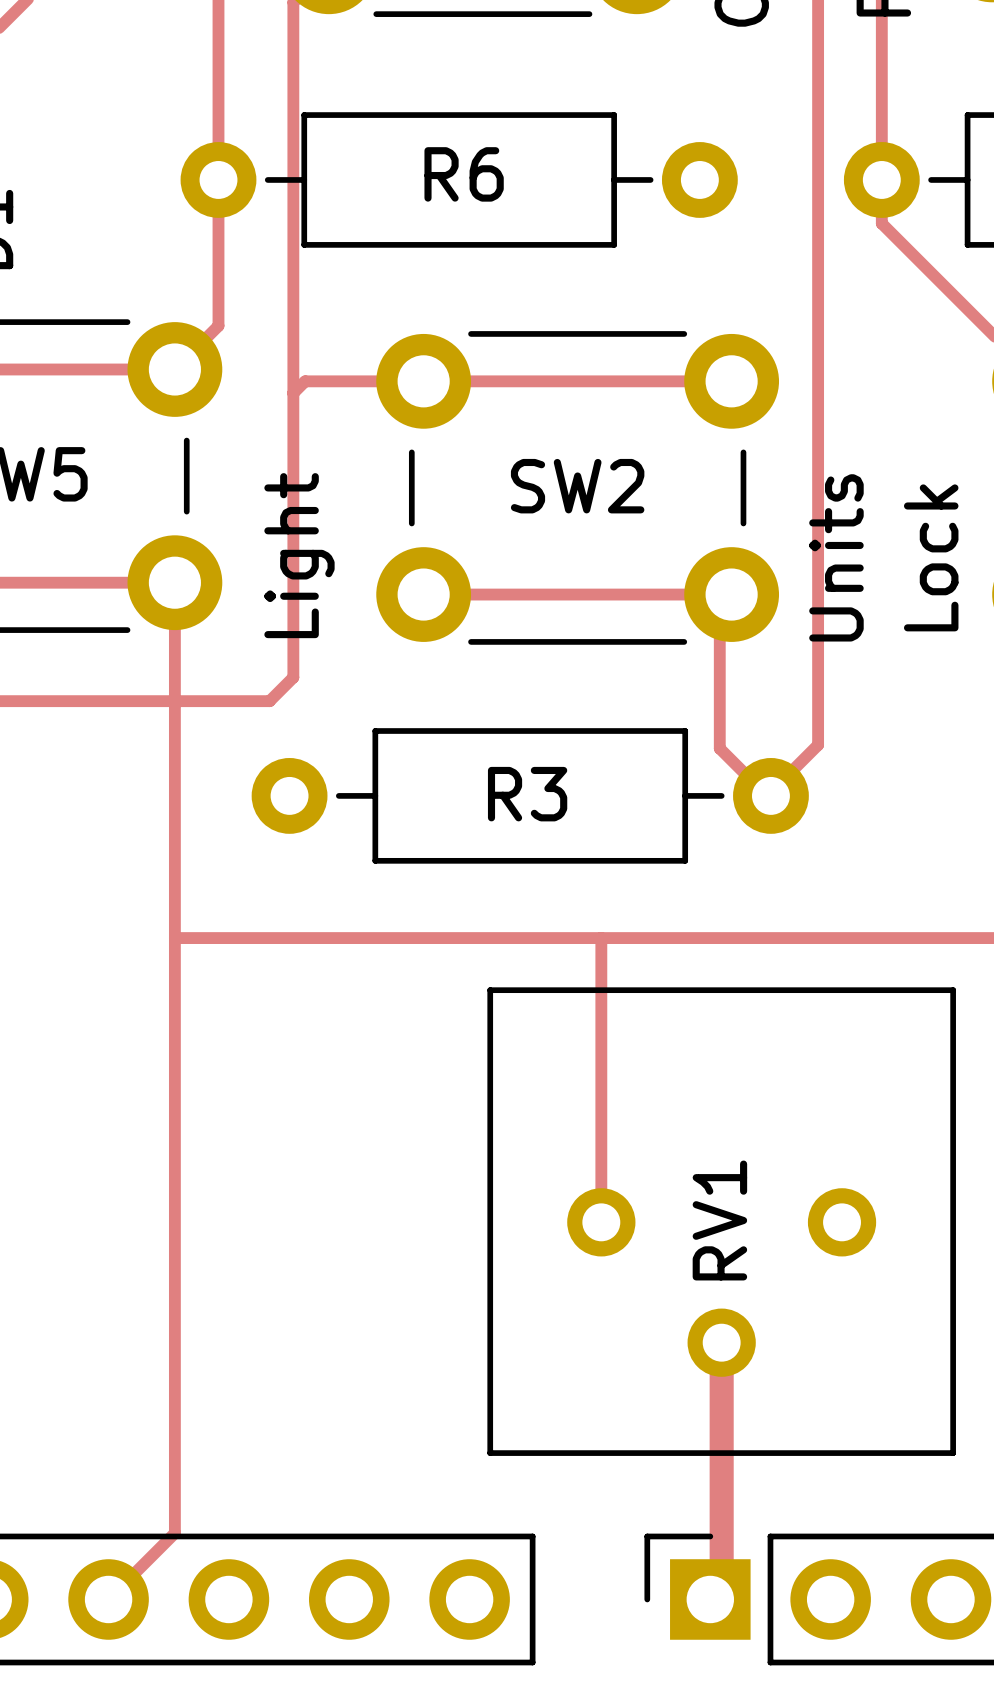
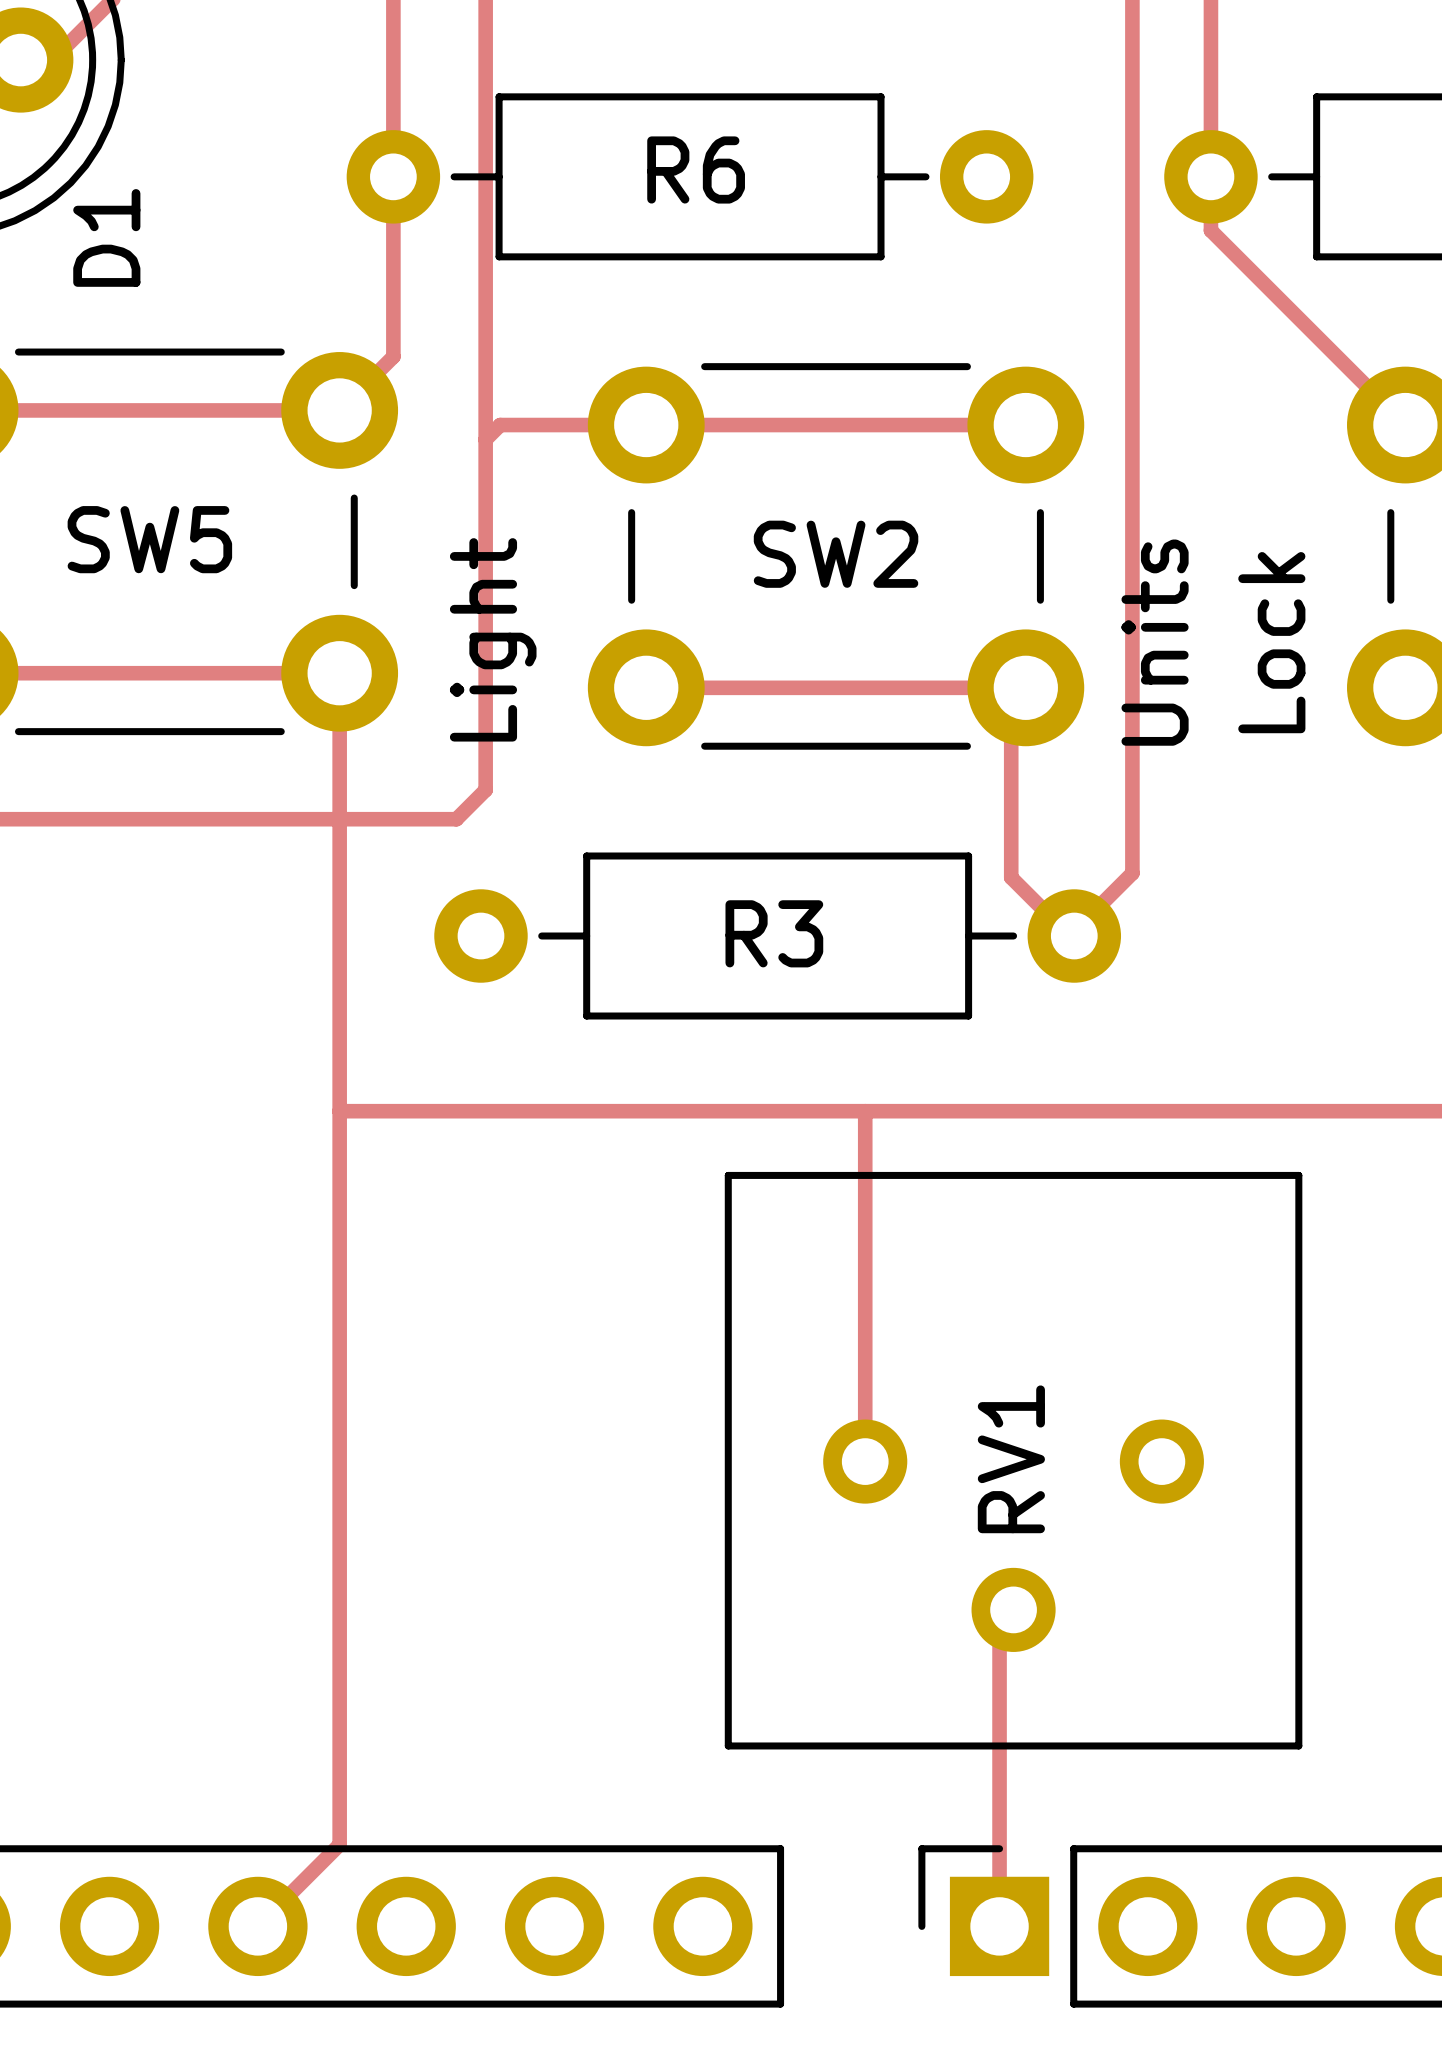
track: (721, 1342) (721, 1588) -> (1013, 1609) (999, 1623) (999, 1926)

